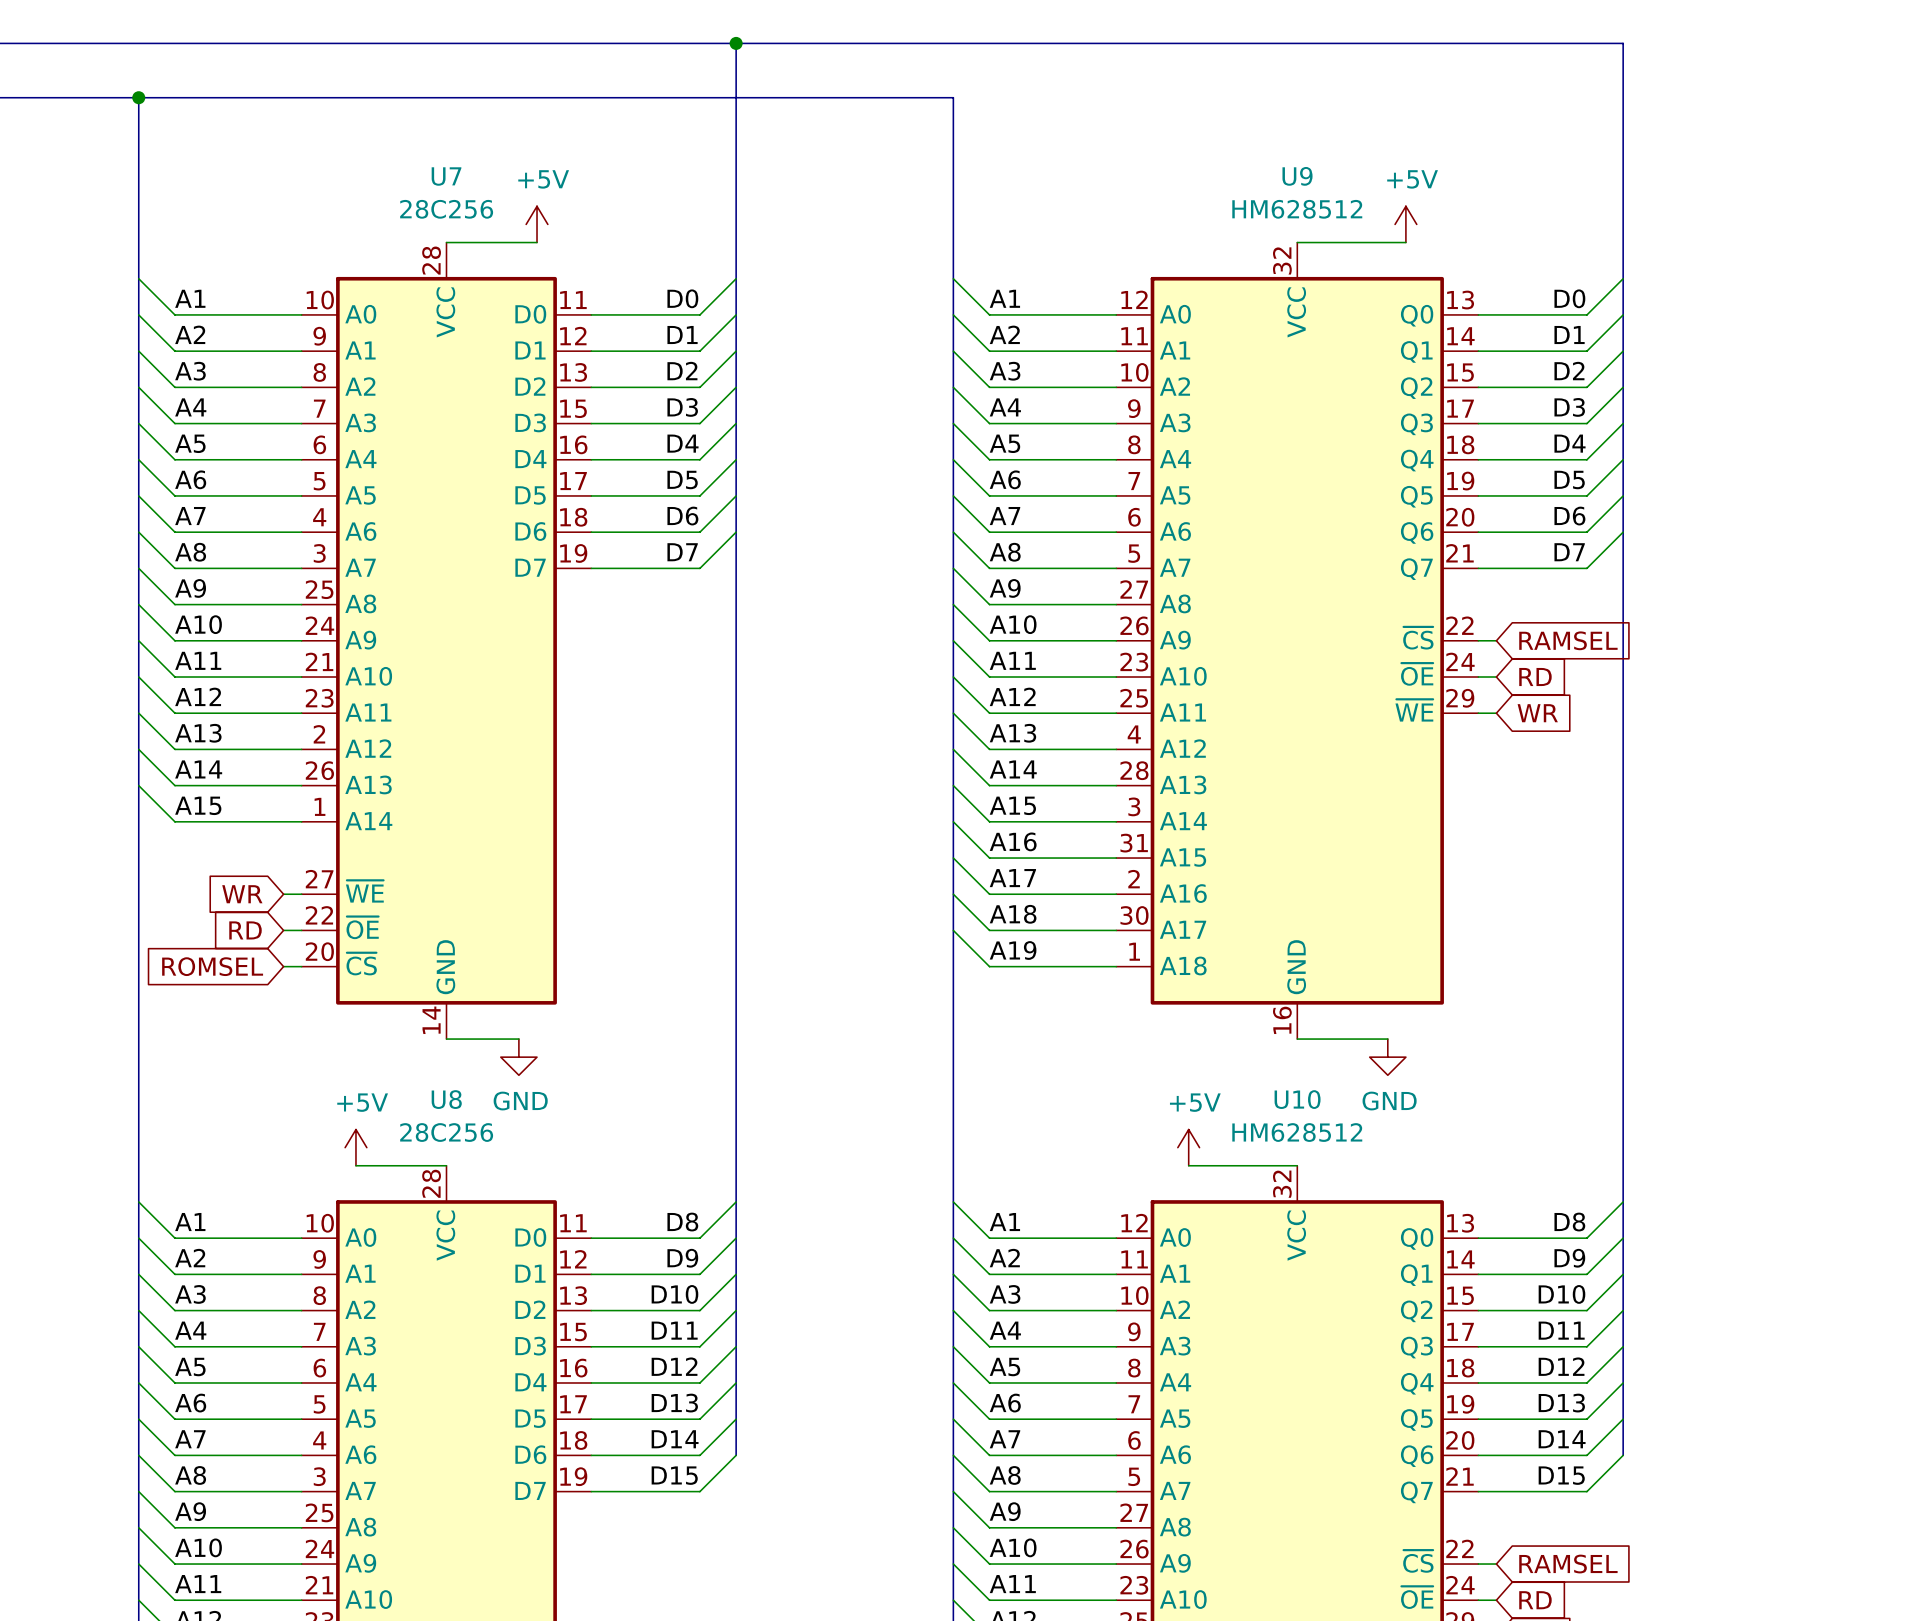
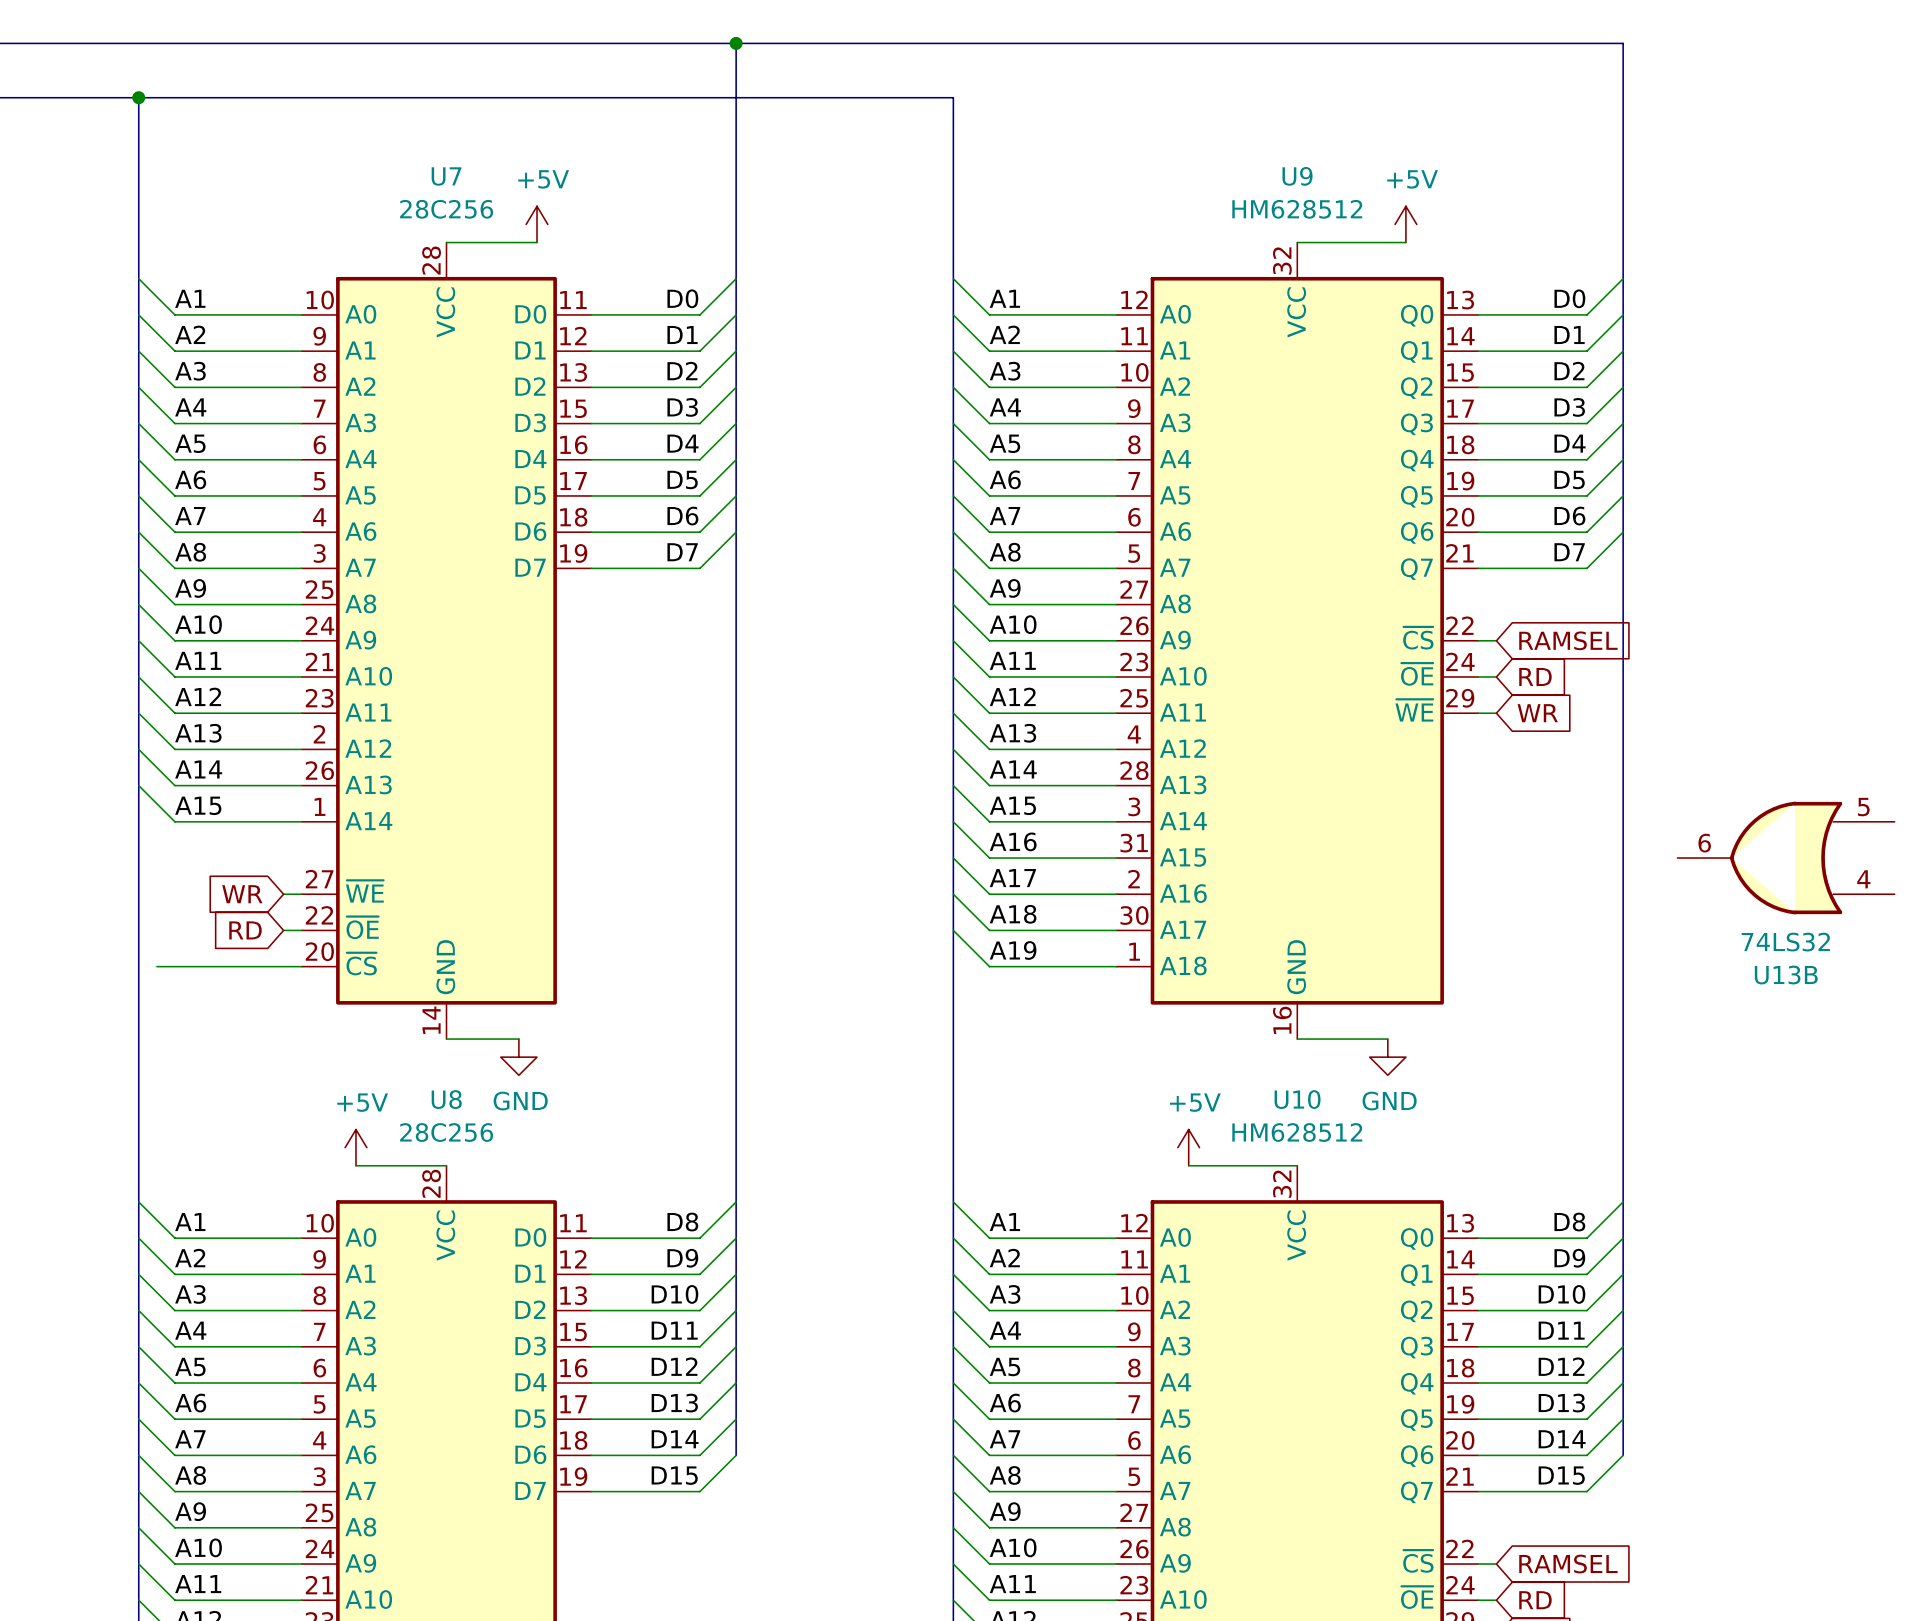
U13B: none -> 74LS32 (1786, 858)
wire: none -> (156, 966) (283, 966)
global label: ROMSEL (212, 966) -> none

